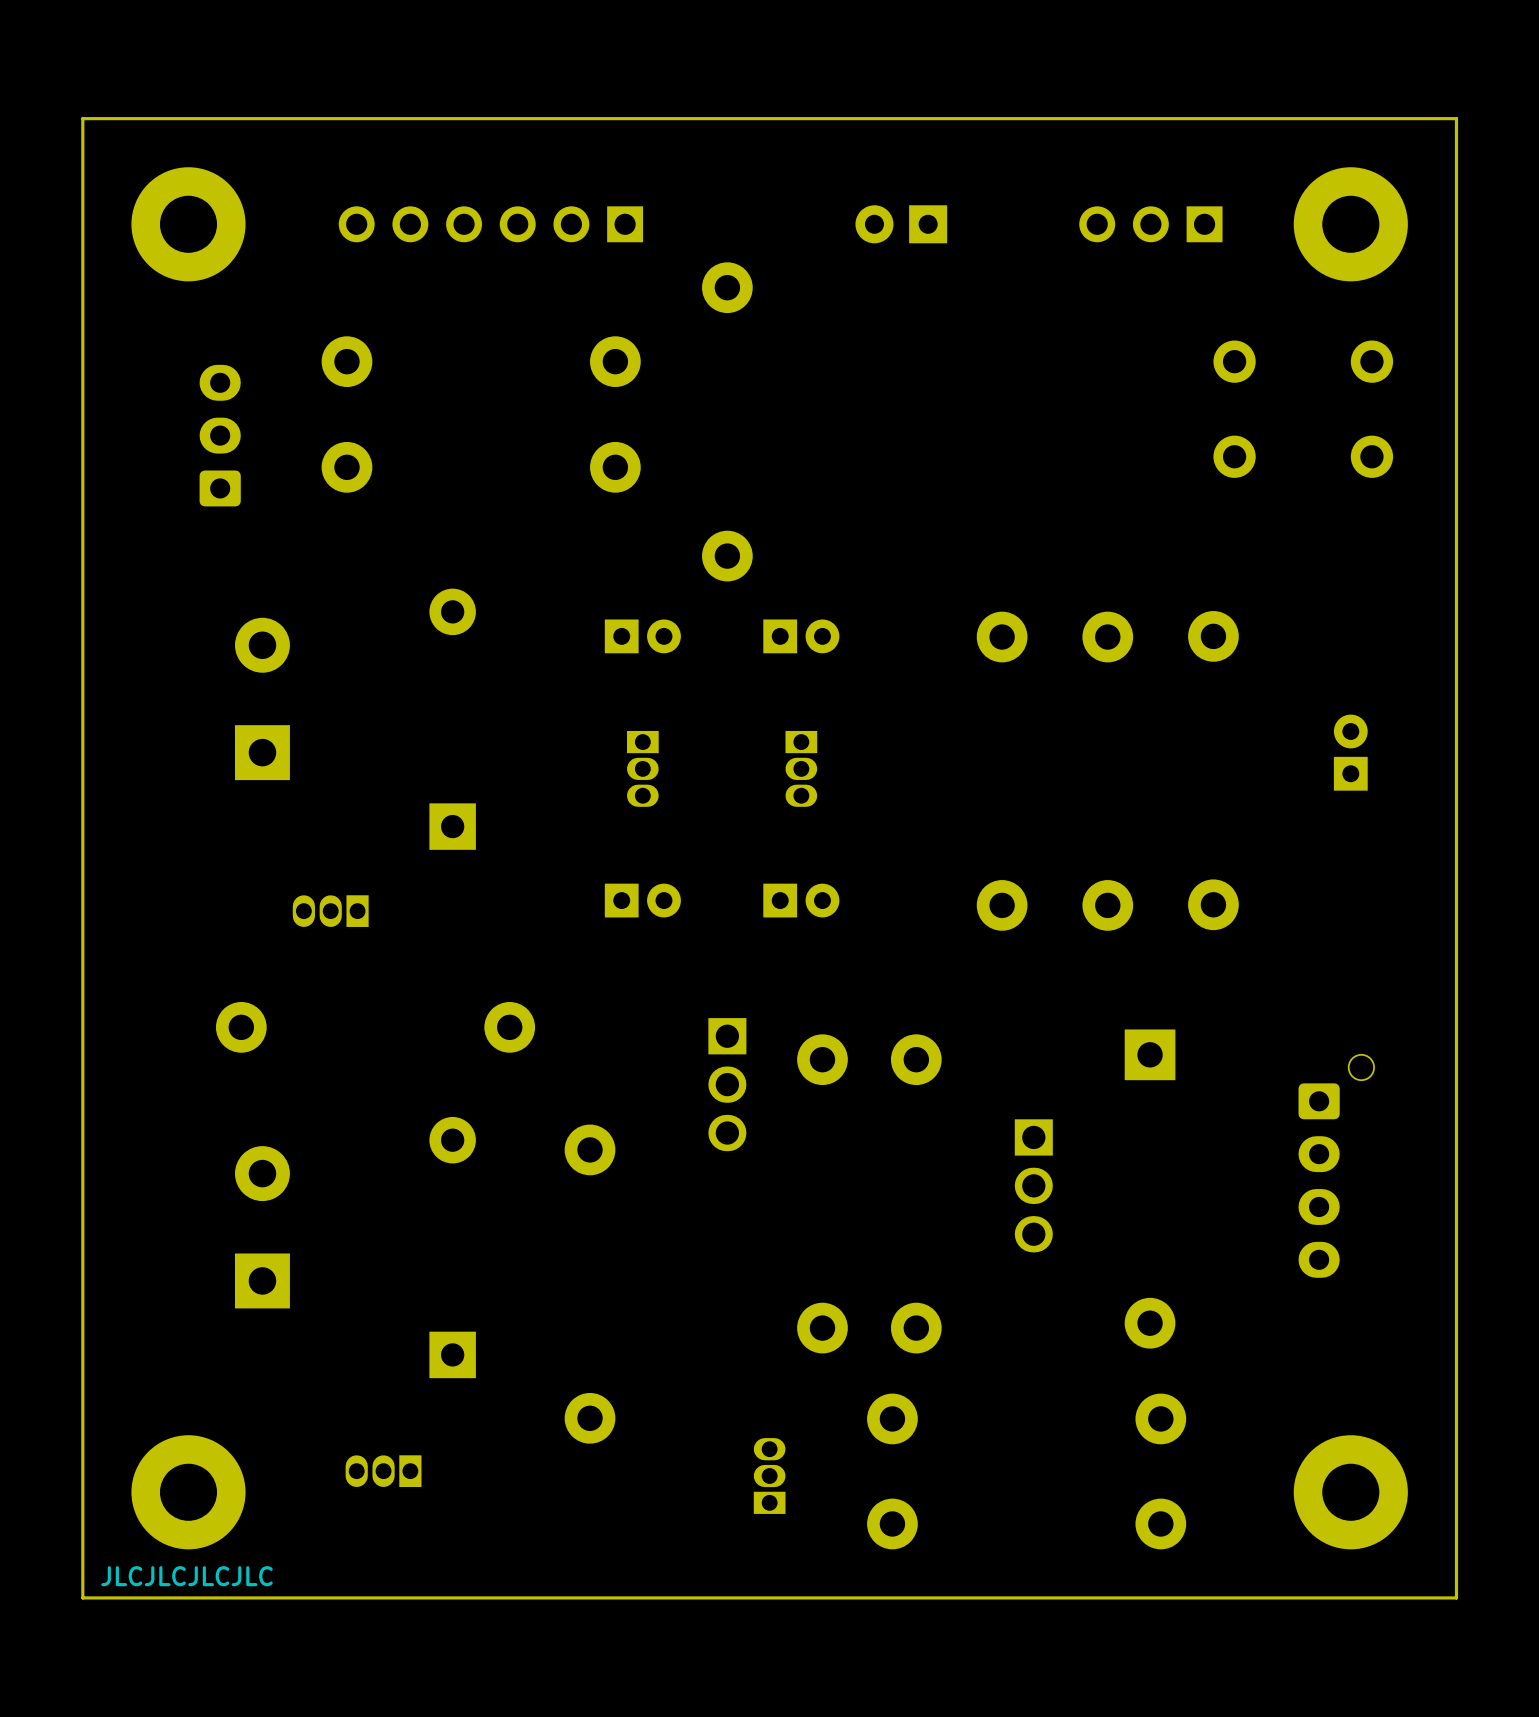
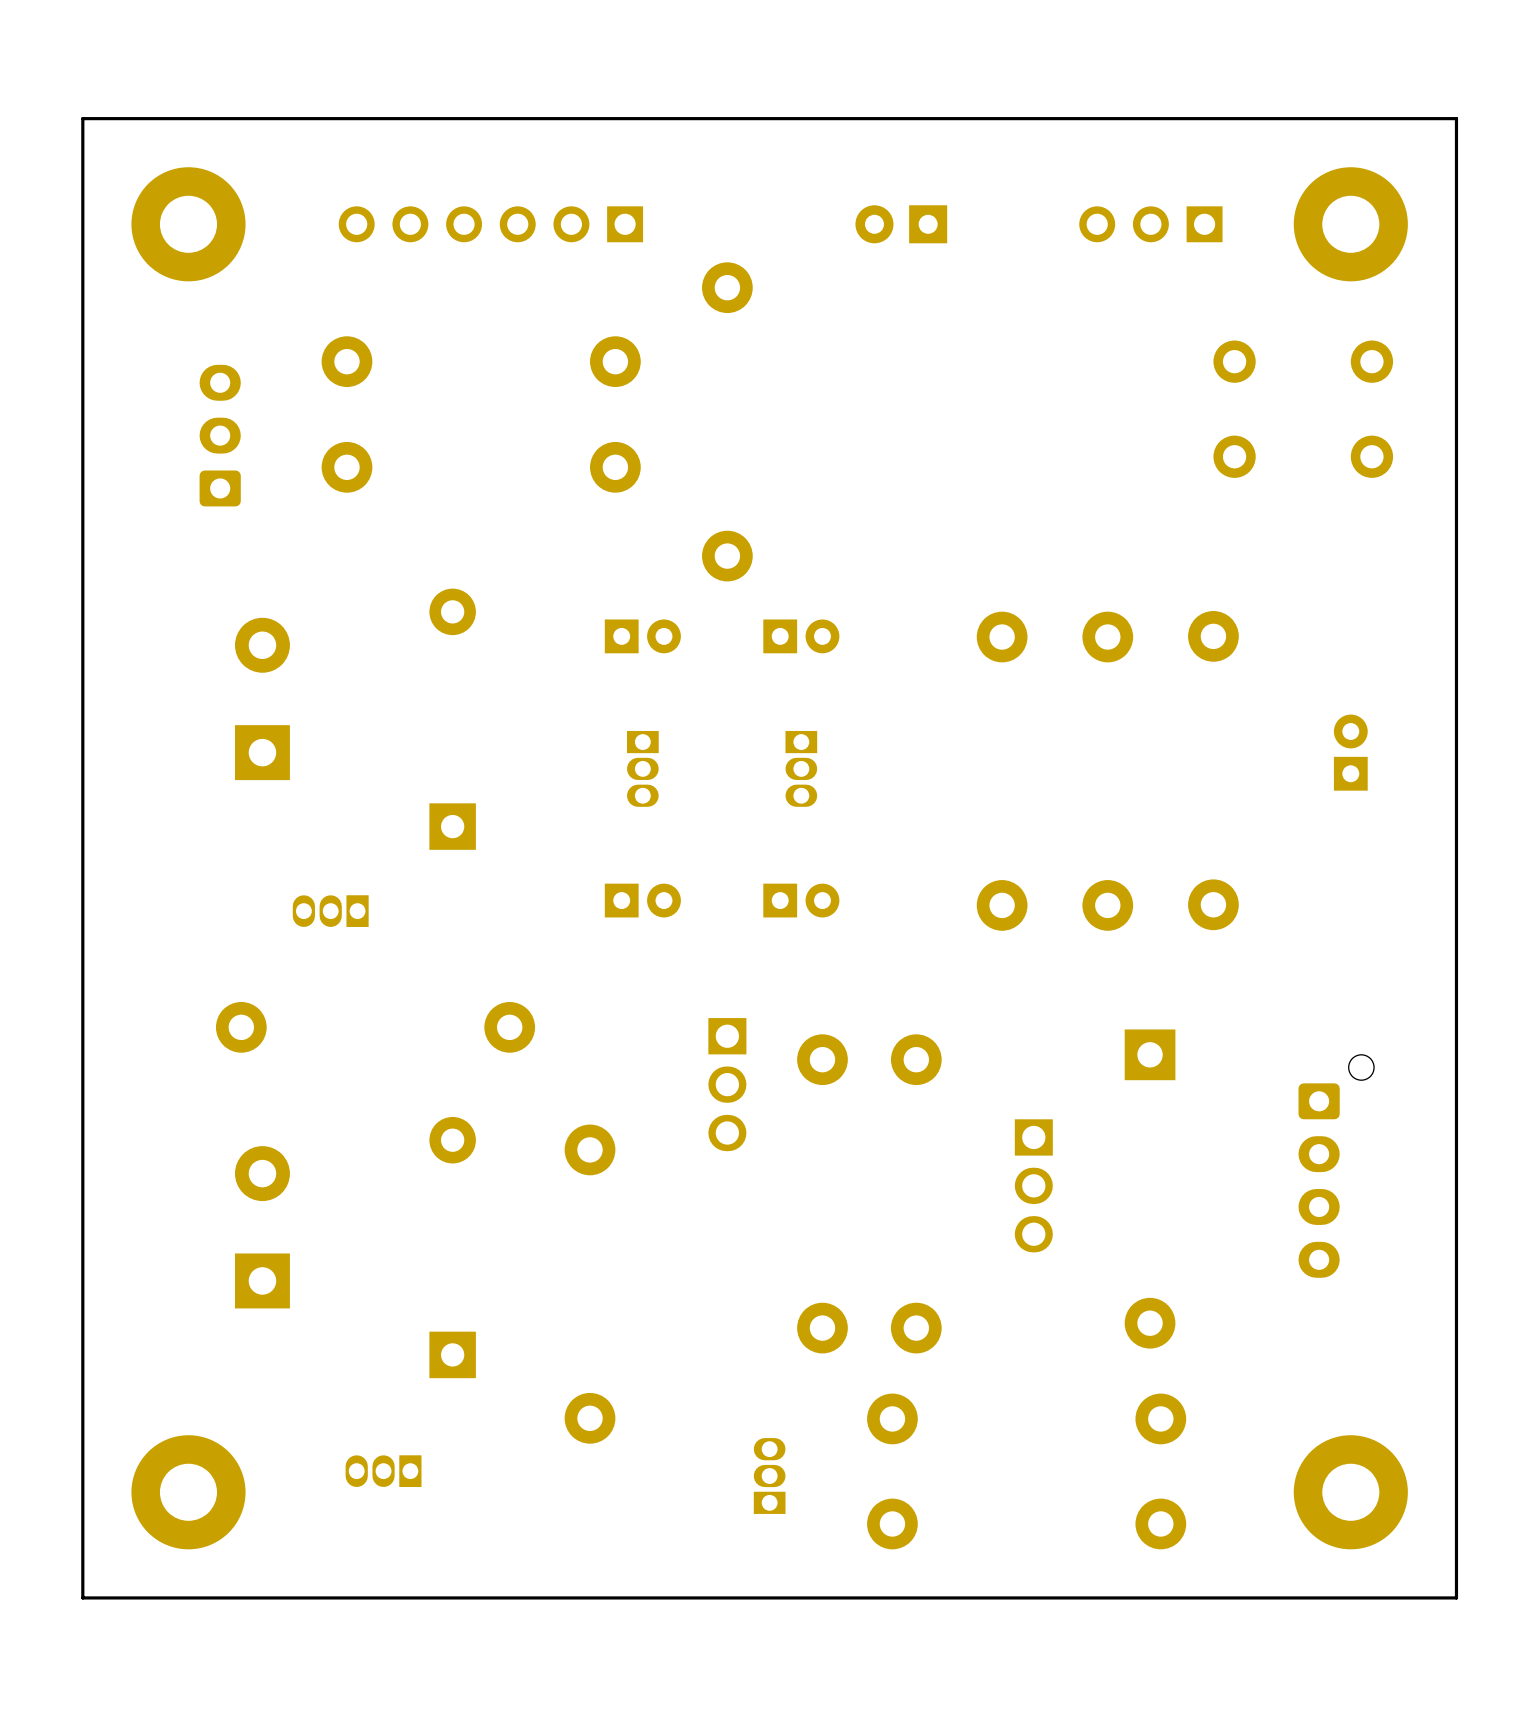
text: JLCJLCJLCJLC (187, 1576) -> none

